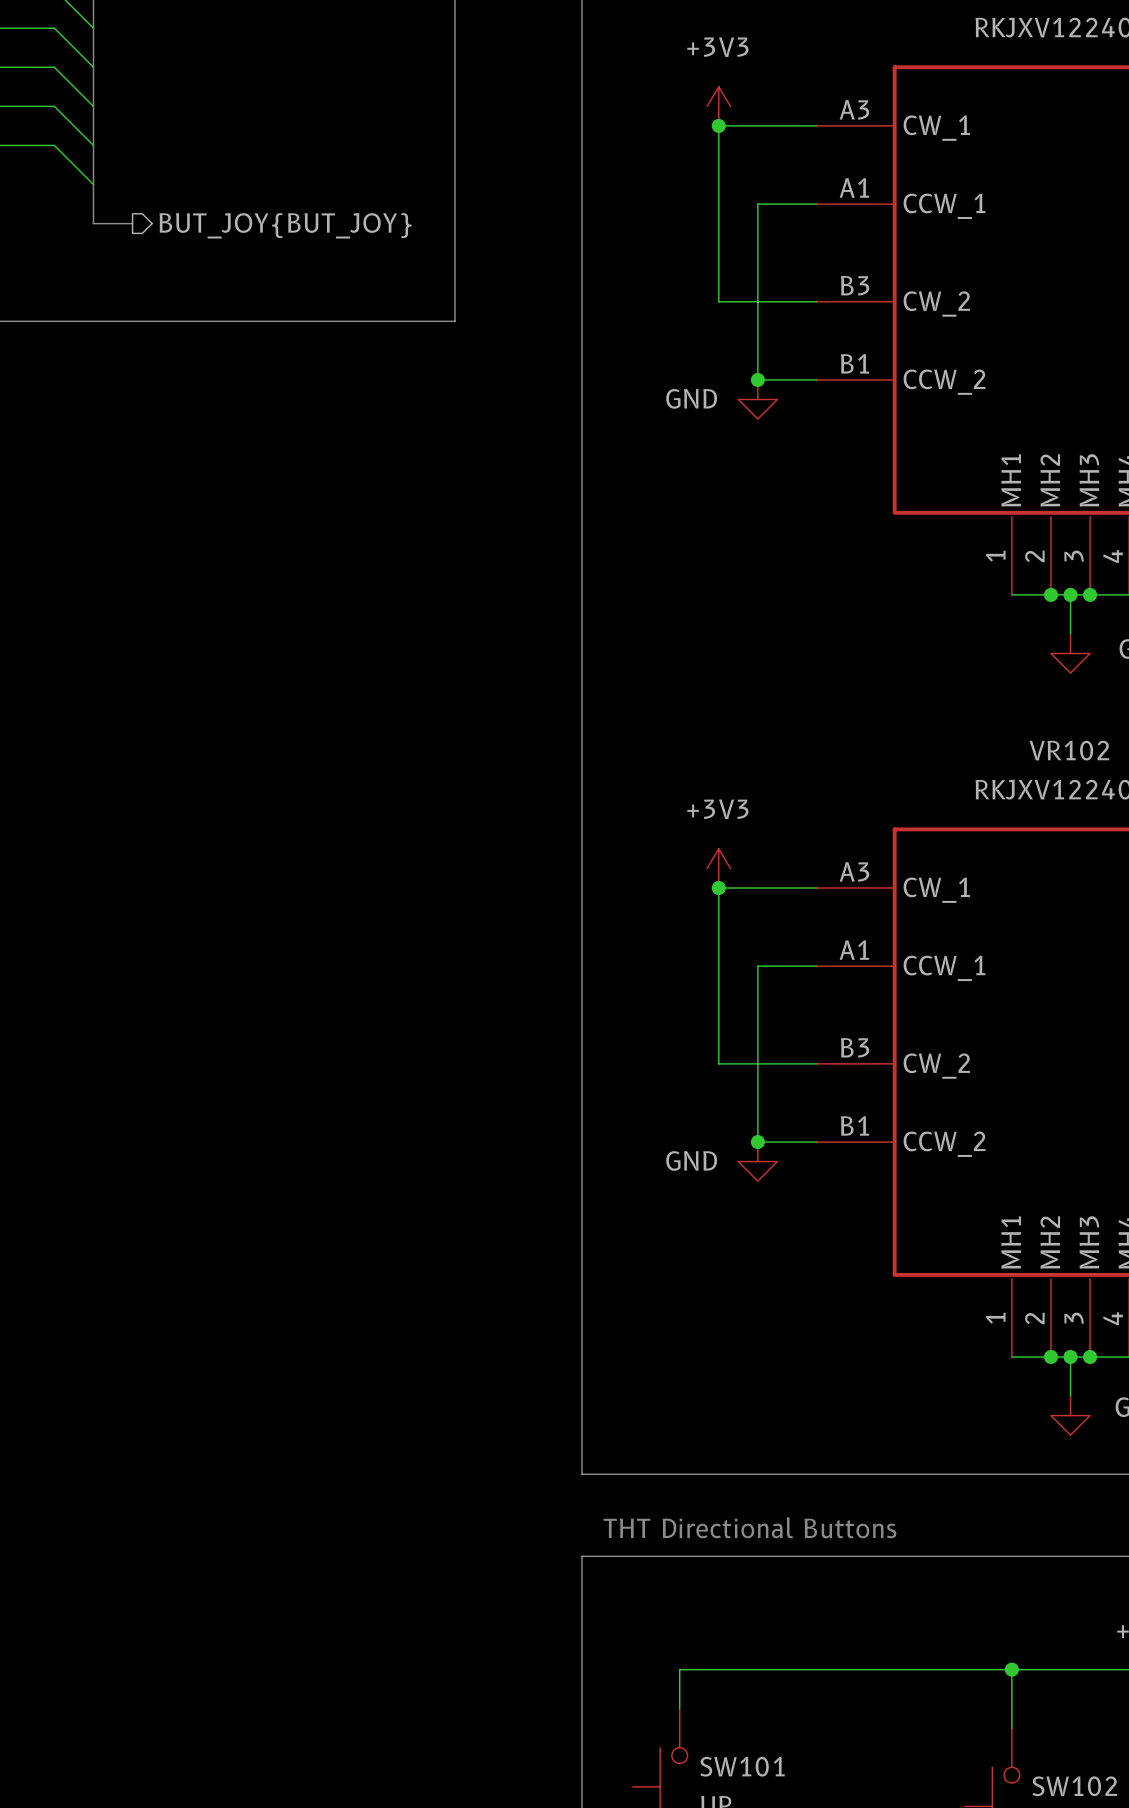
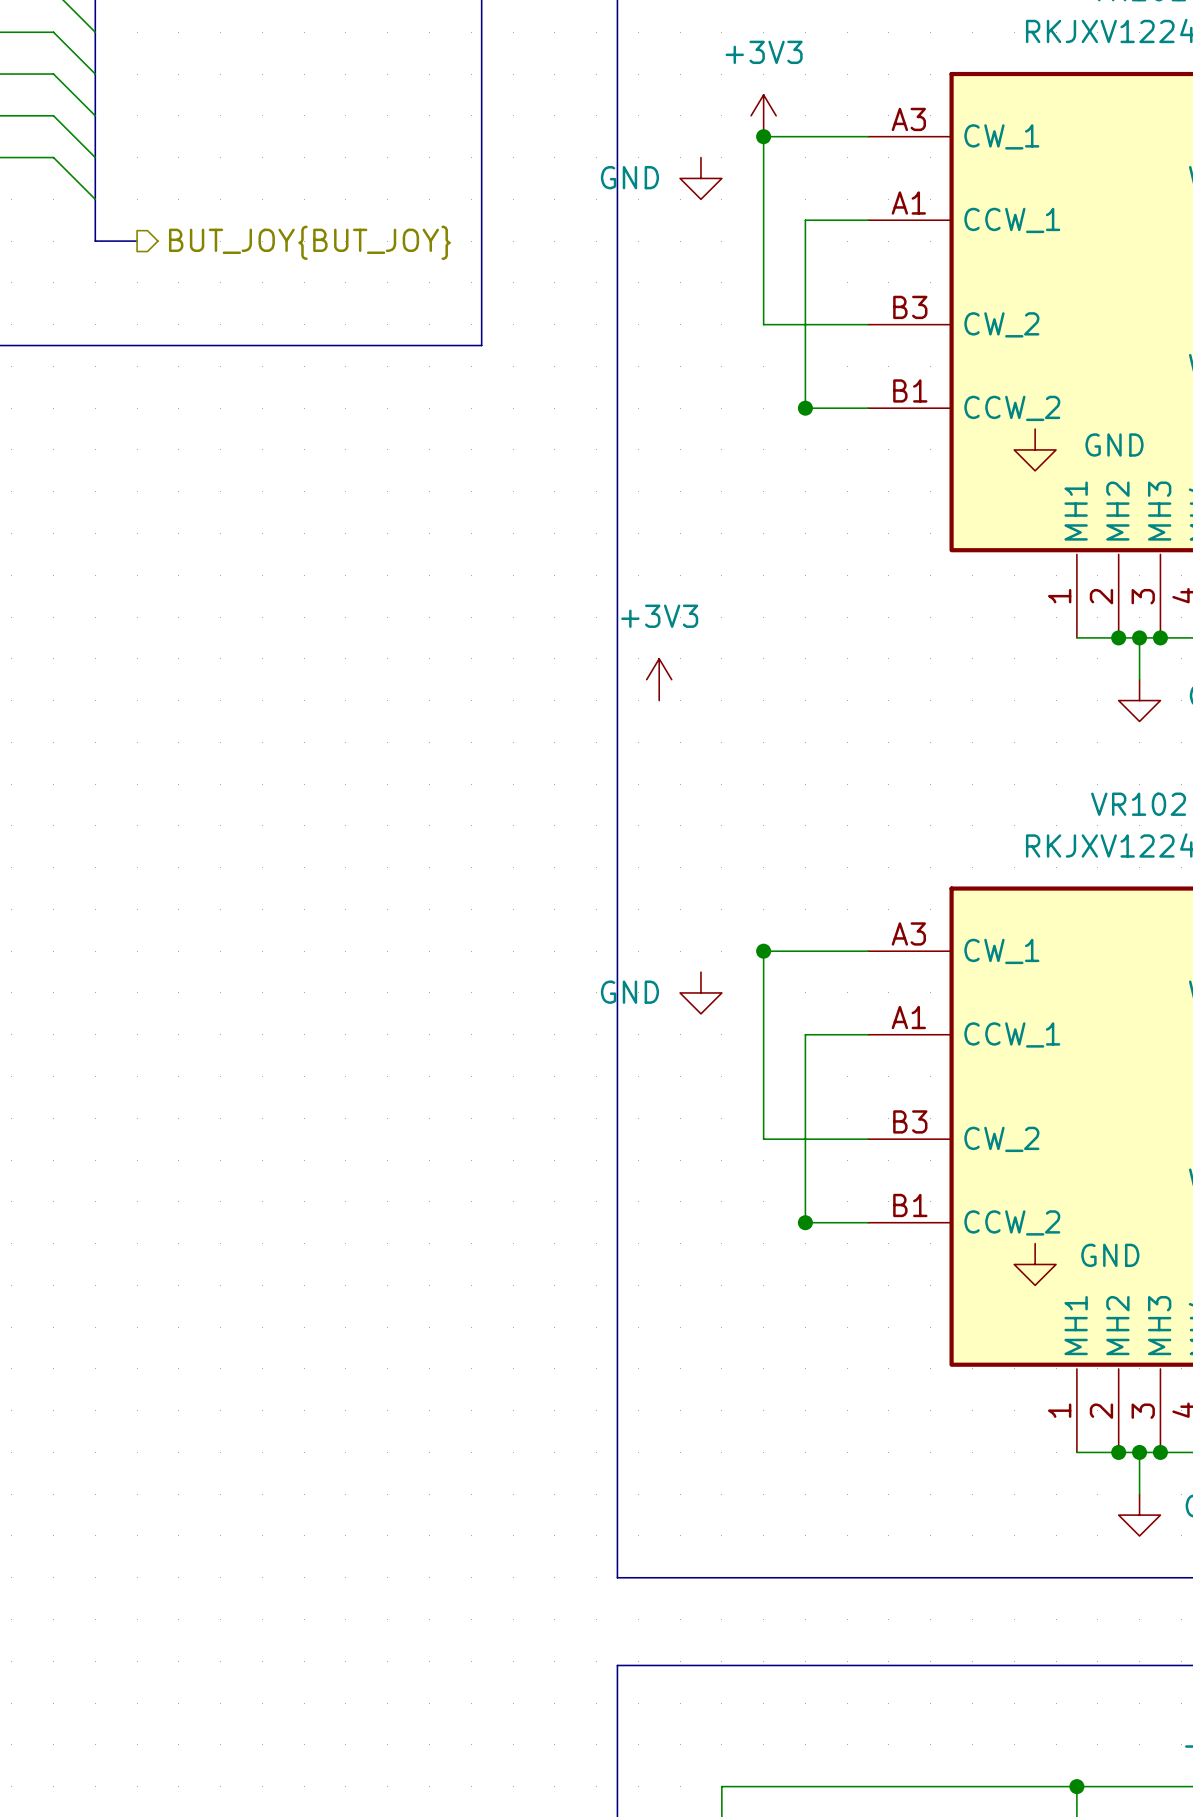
power symbol: none -> GND (700, 178)
power symbol: GND (757, 399) -> none
power symbol: none -> GND (1035, 449)
power symbol position: +3V3 (718, 868) -> +3V3 (659, 679)
power symbol: none -> GND (700, 992)
power symbol: GND (757, 1161) -> none
power symbol: none -> GND (1035, 1264)
text: THT Directional Buttons (749, 1527) -> none

